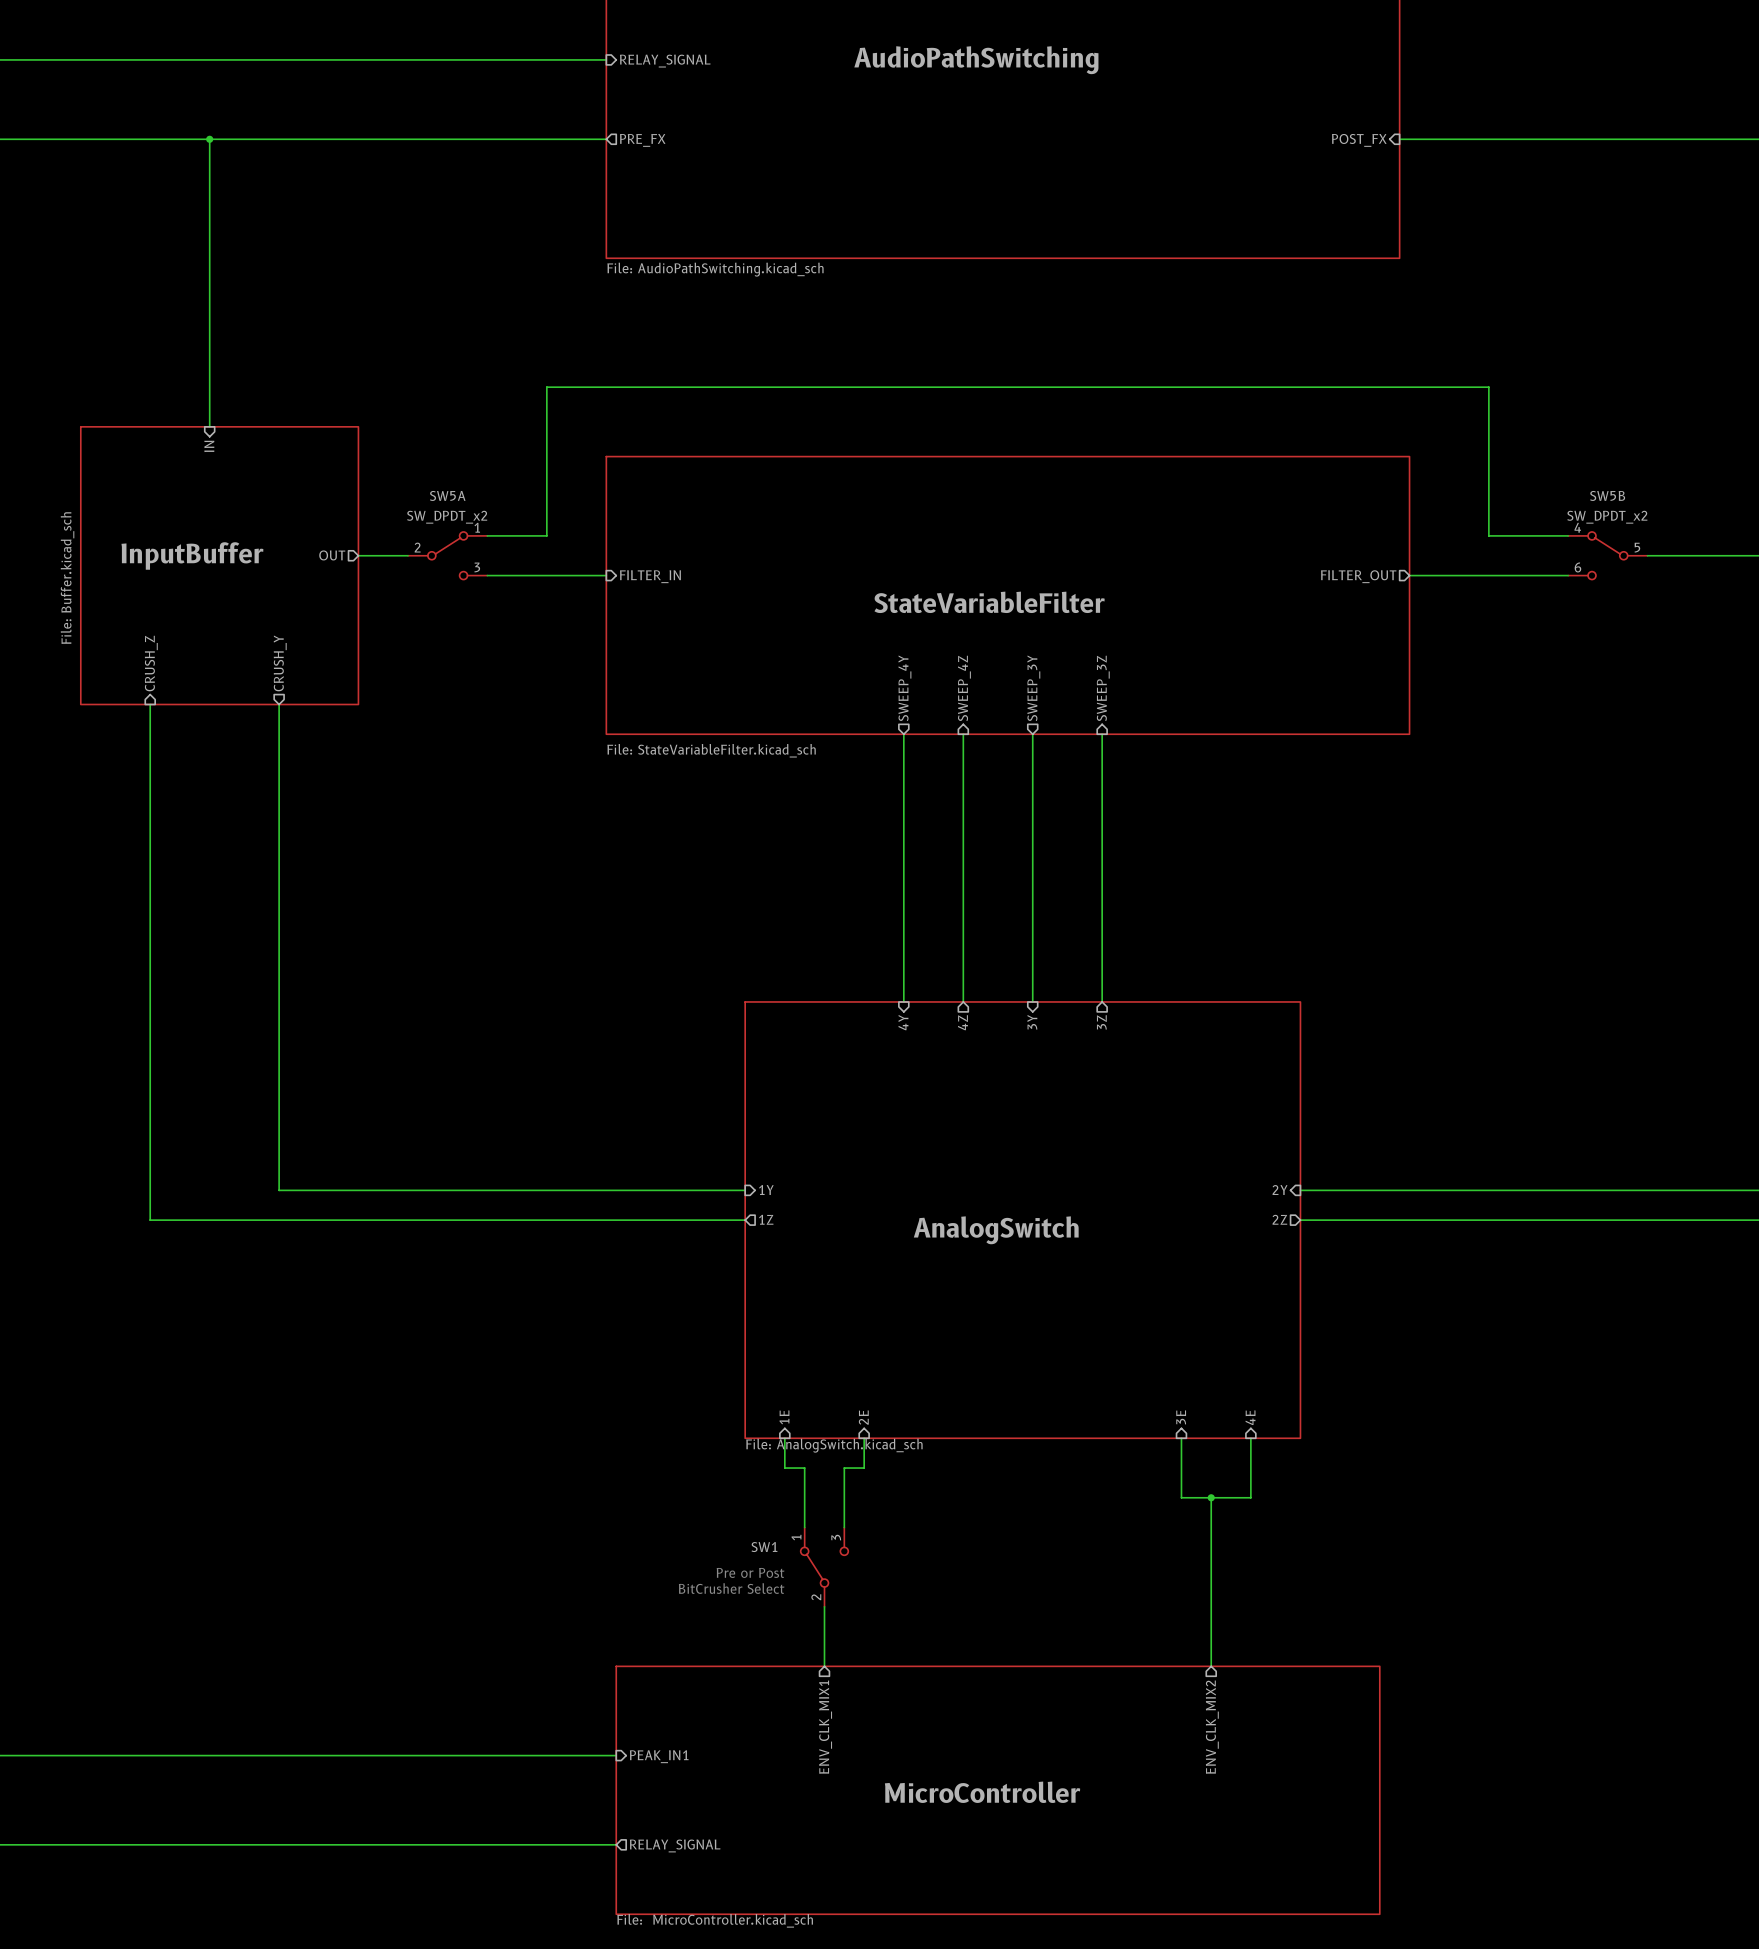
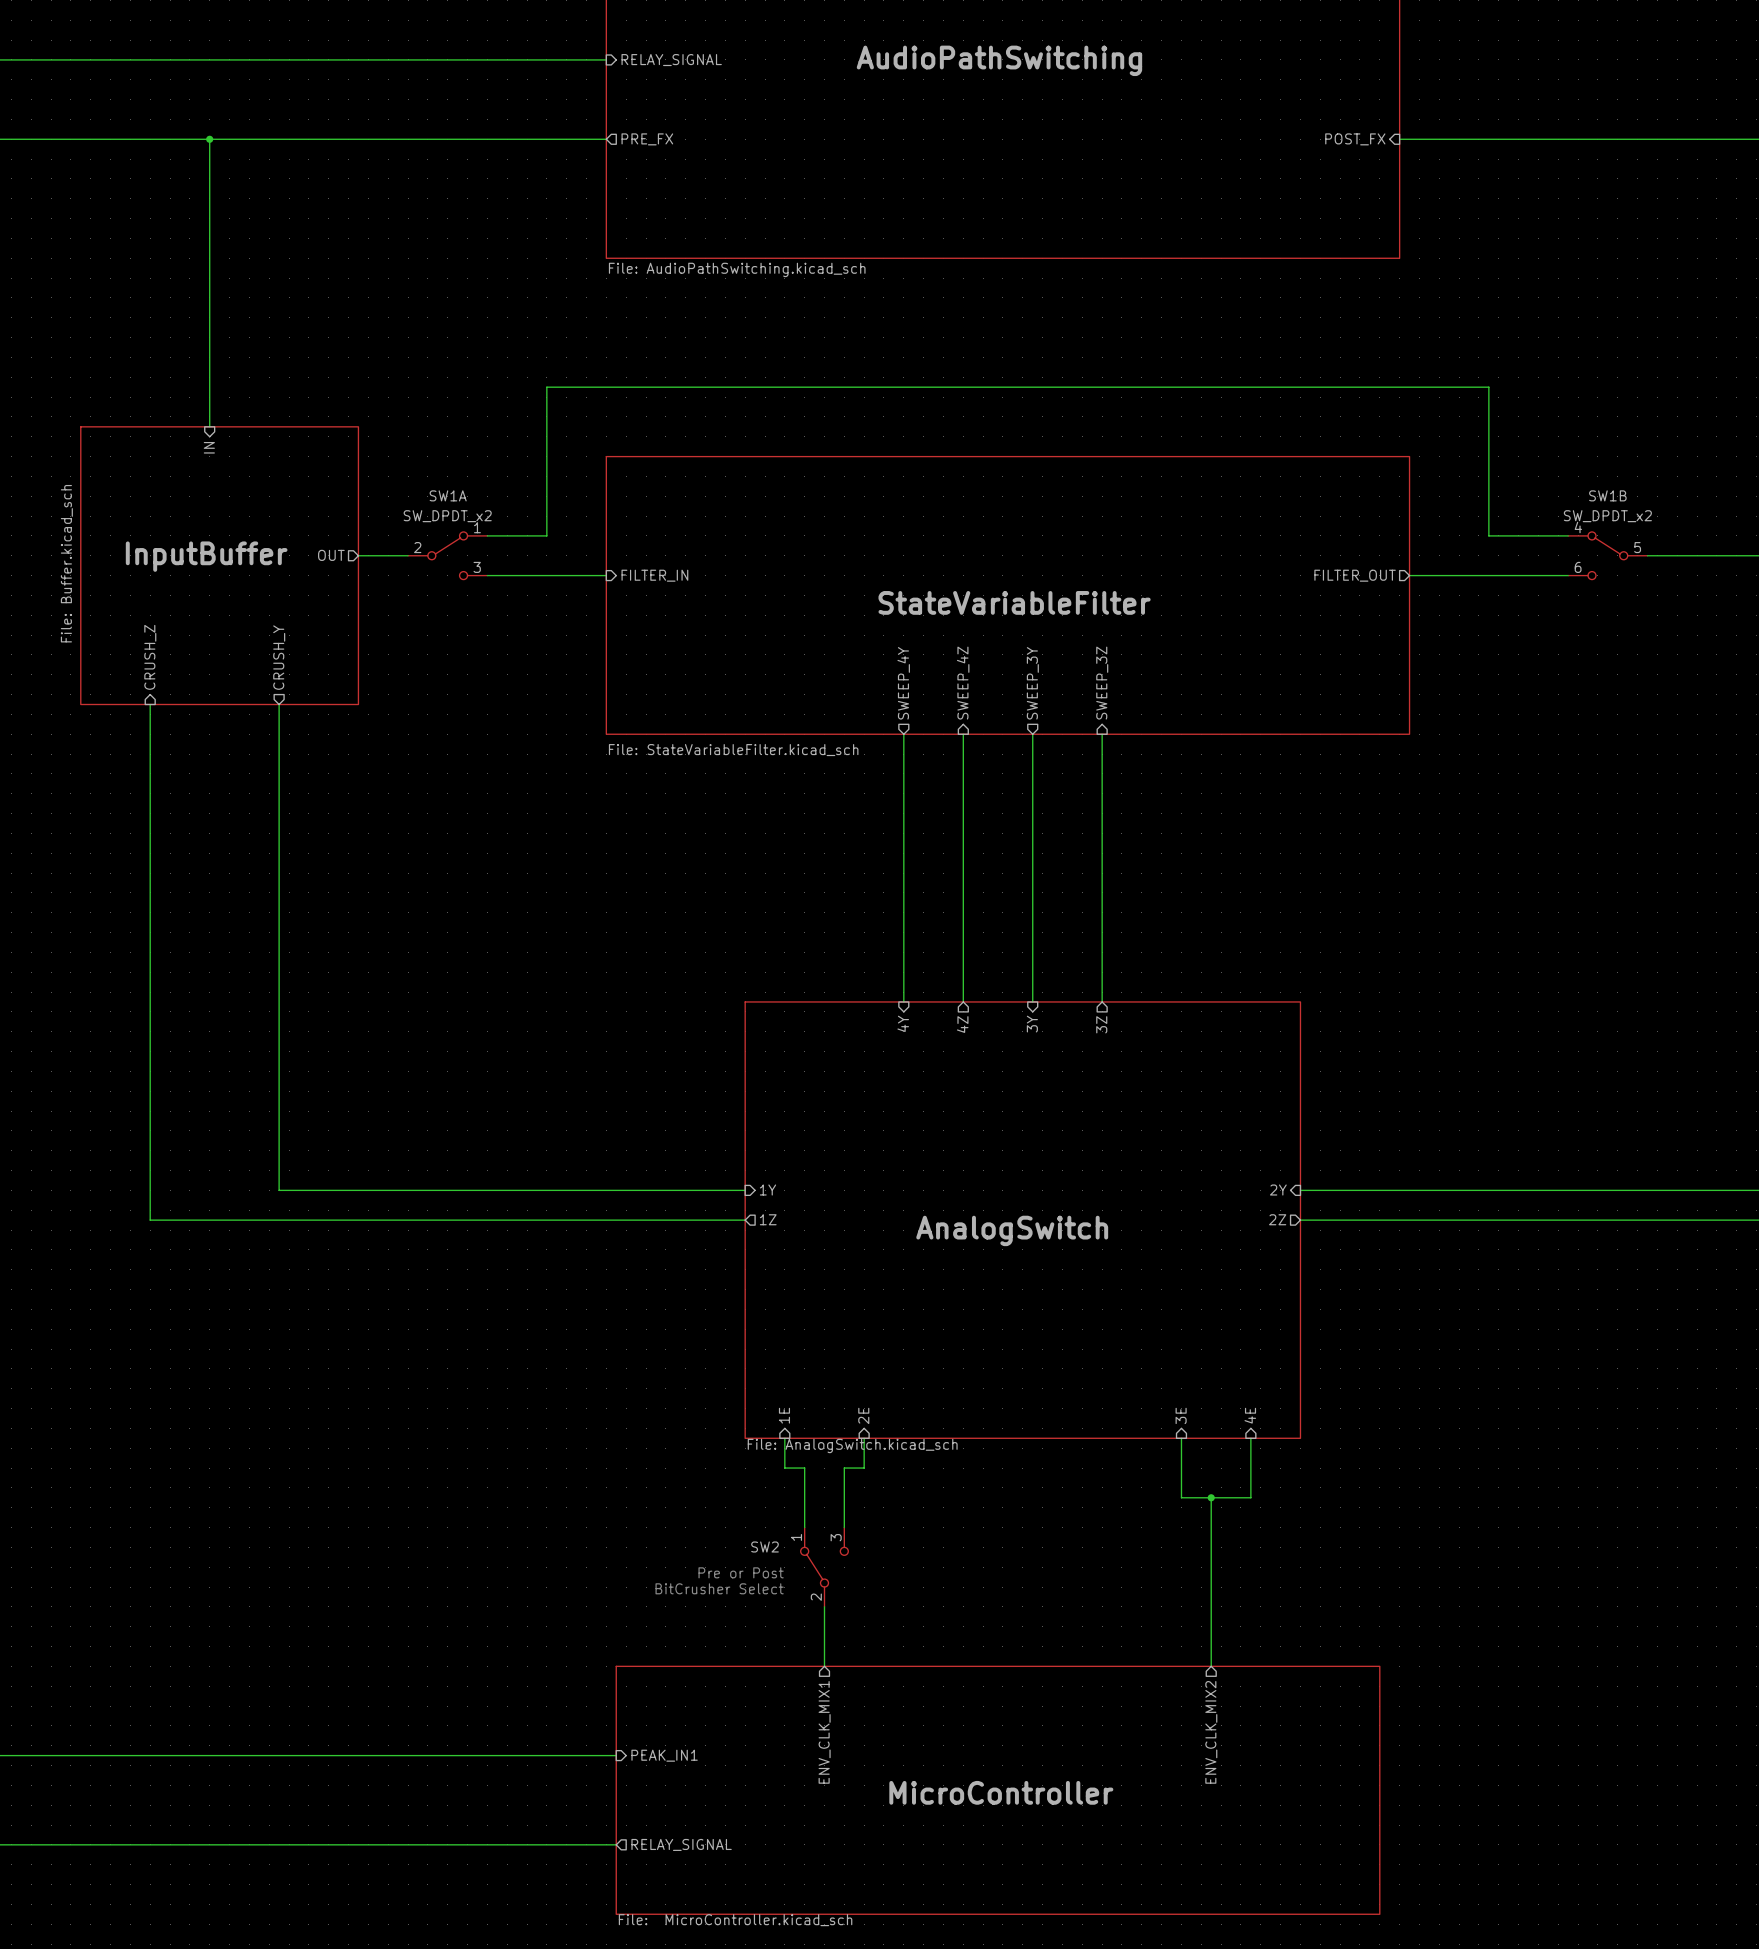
SW5A name: SW5A (447, 495) -> SW1A (448, 495)
SW5B name: SW5B (1607, 495) -> SW1B (1607, 495)
SW1 name: SW1 (764, 1547) -> SW2 (765, 1546)

